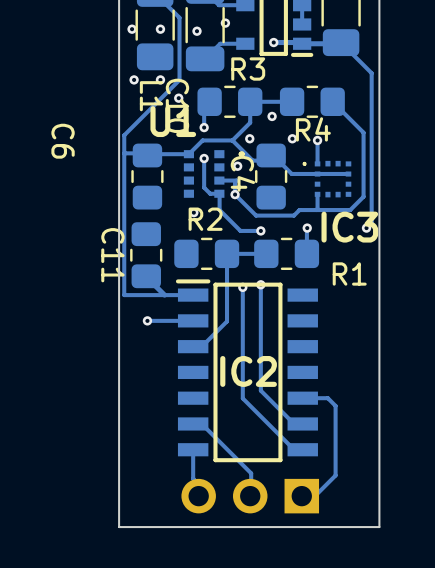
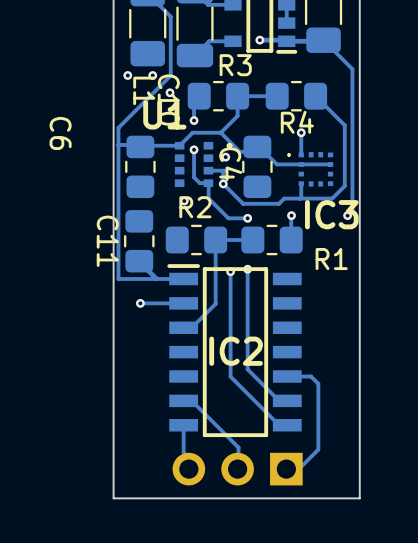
via: (225, 23) -> none
via: (132, 29) -> none
via: (160, 29) -> none
via: (197, 31) -> none
via: (272, 116) -> none
via: (249, 138) -> none
via: (292, 138) -> none

